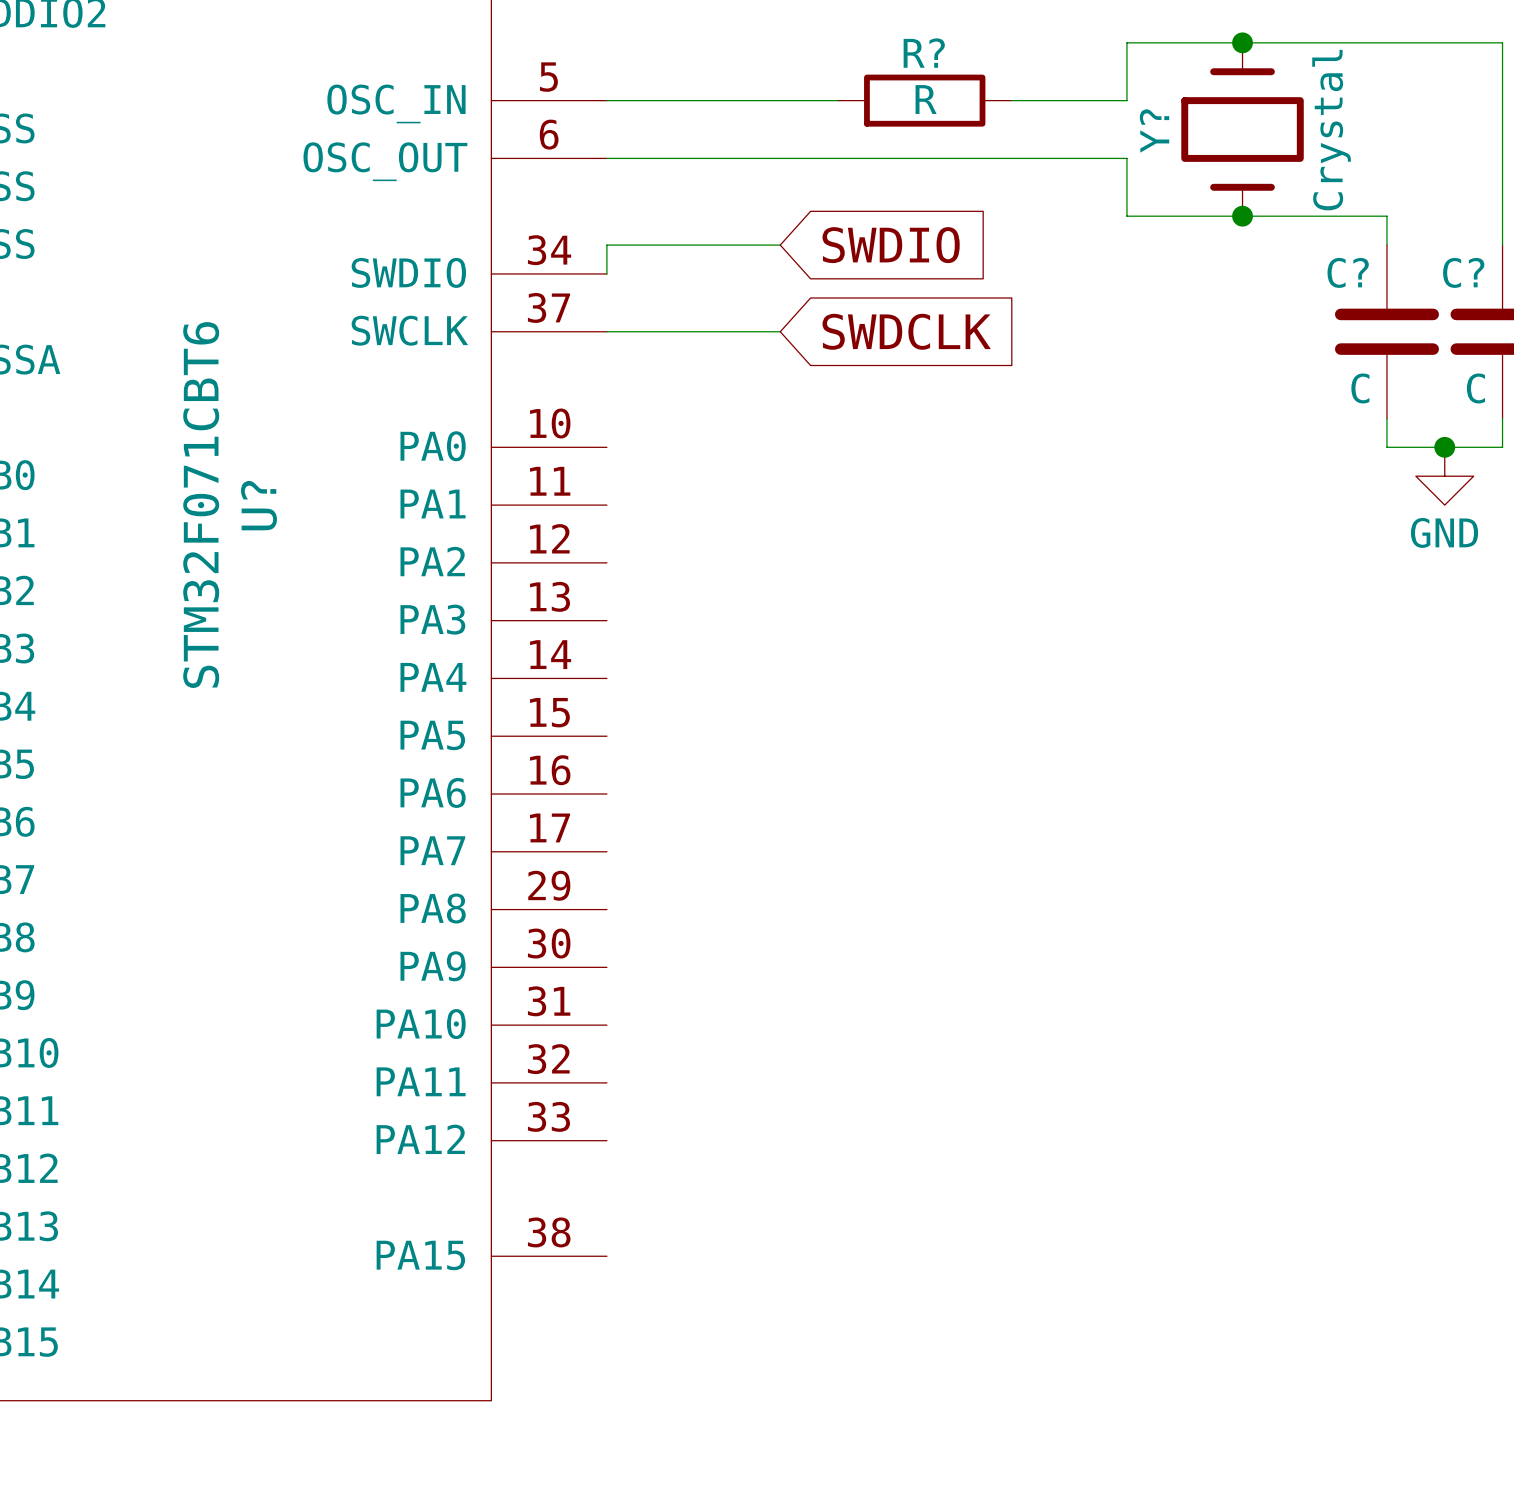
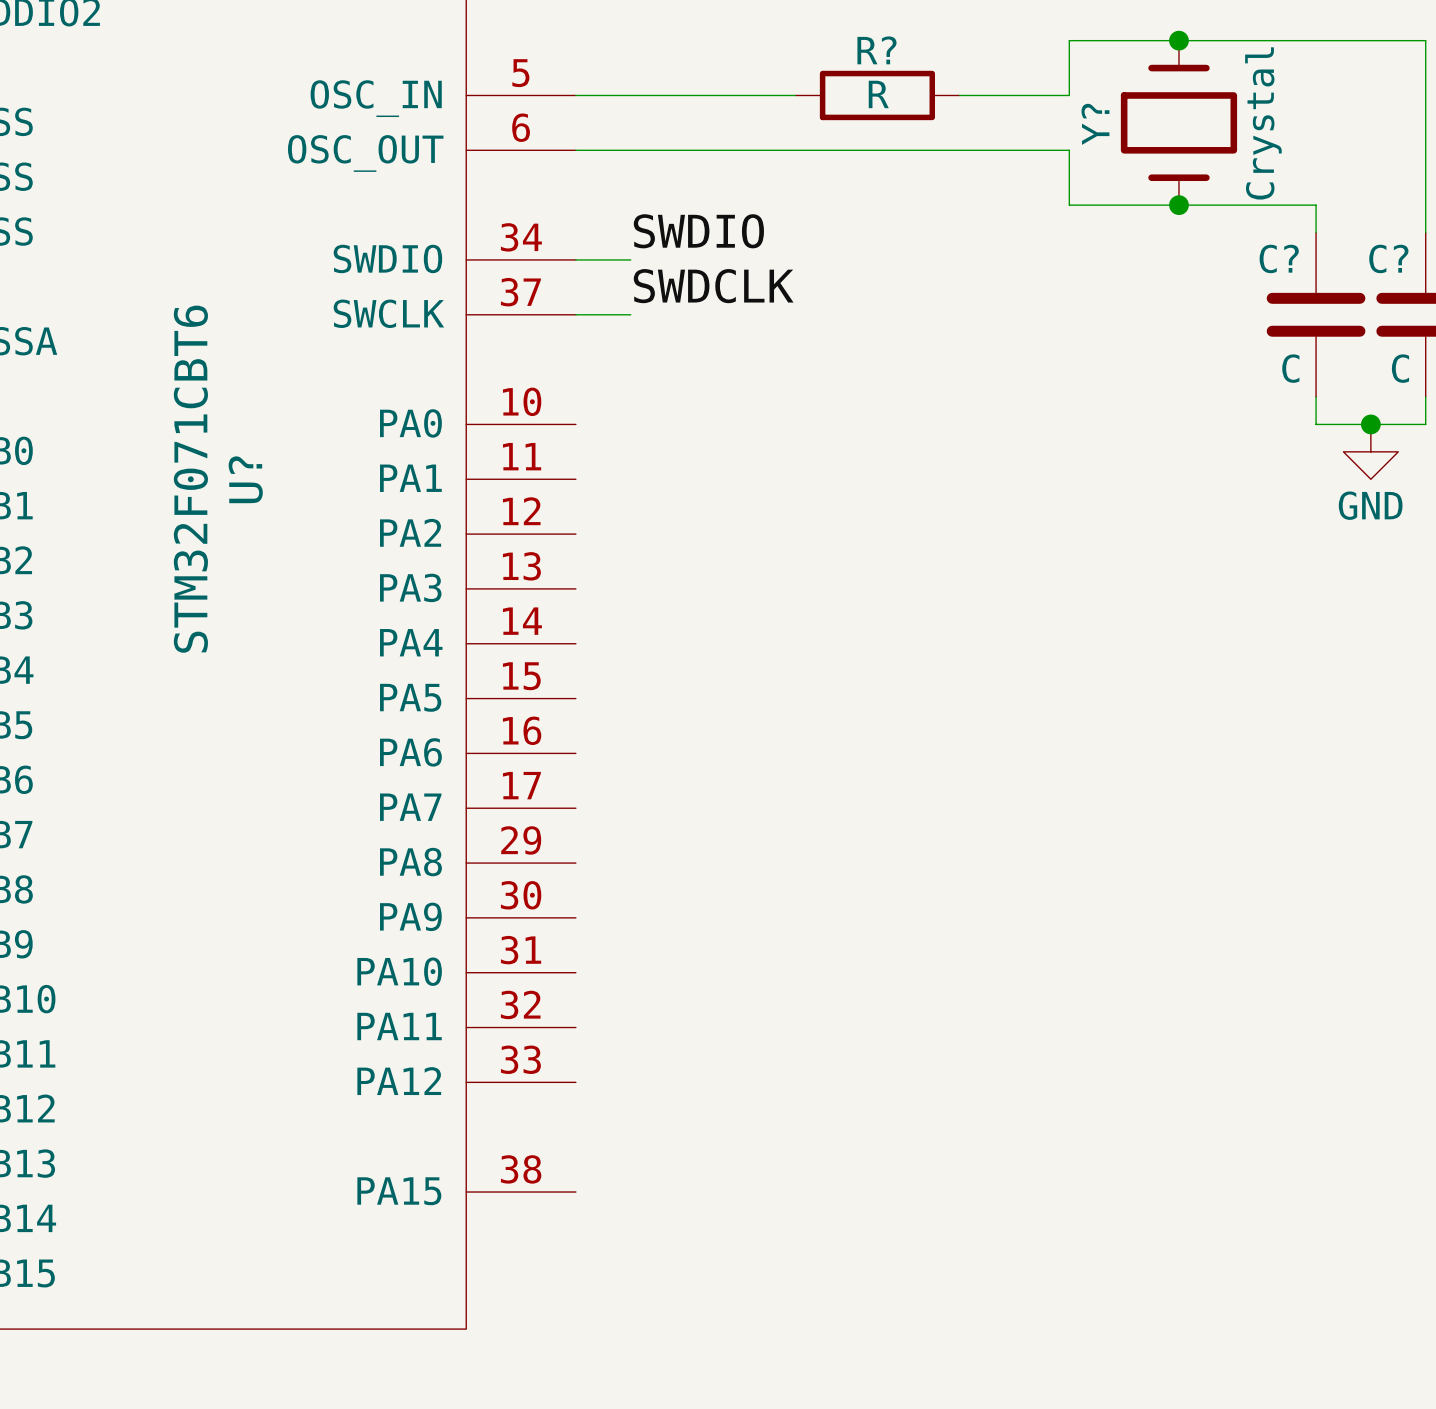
label: none -> SWDIO (698, 231)
wire: (780, 245) (606, 245) (606, 273) -> (630, 259) (575, 259)
global label: SWDIO (891, 245) -> none
label: none -> SWDCLK (713, 286)
wire: (664, 331) (780, 331) -> none
global label: SWDCLK (906, 331) -> none

